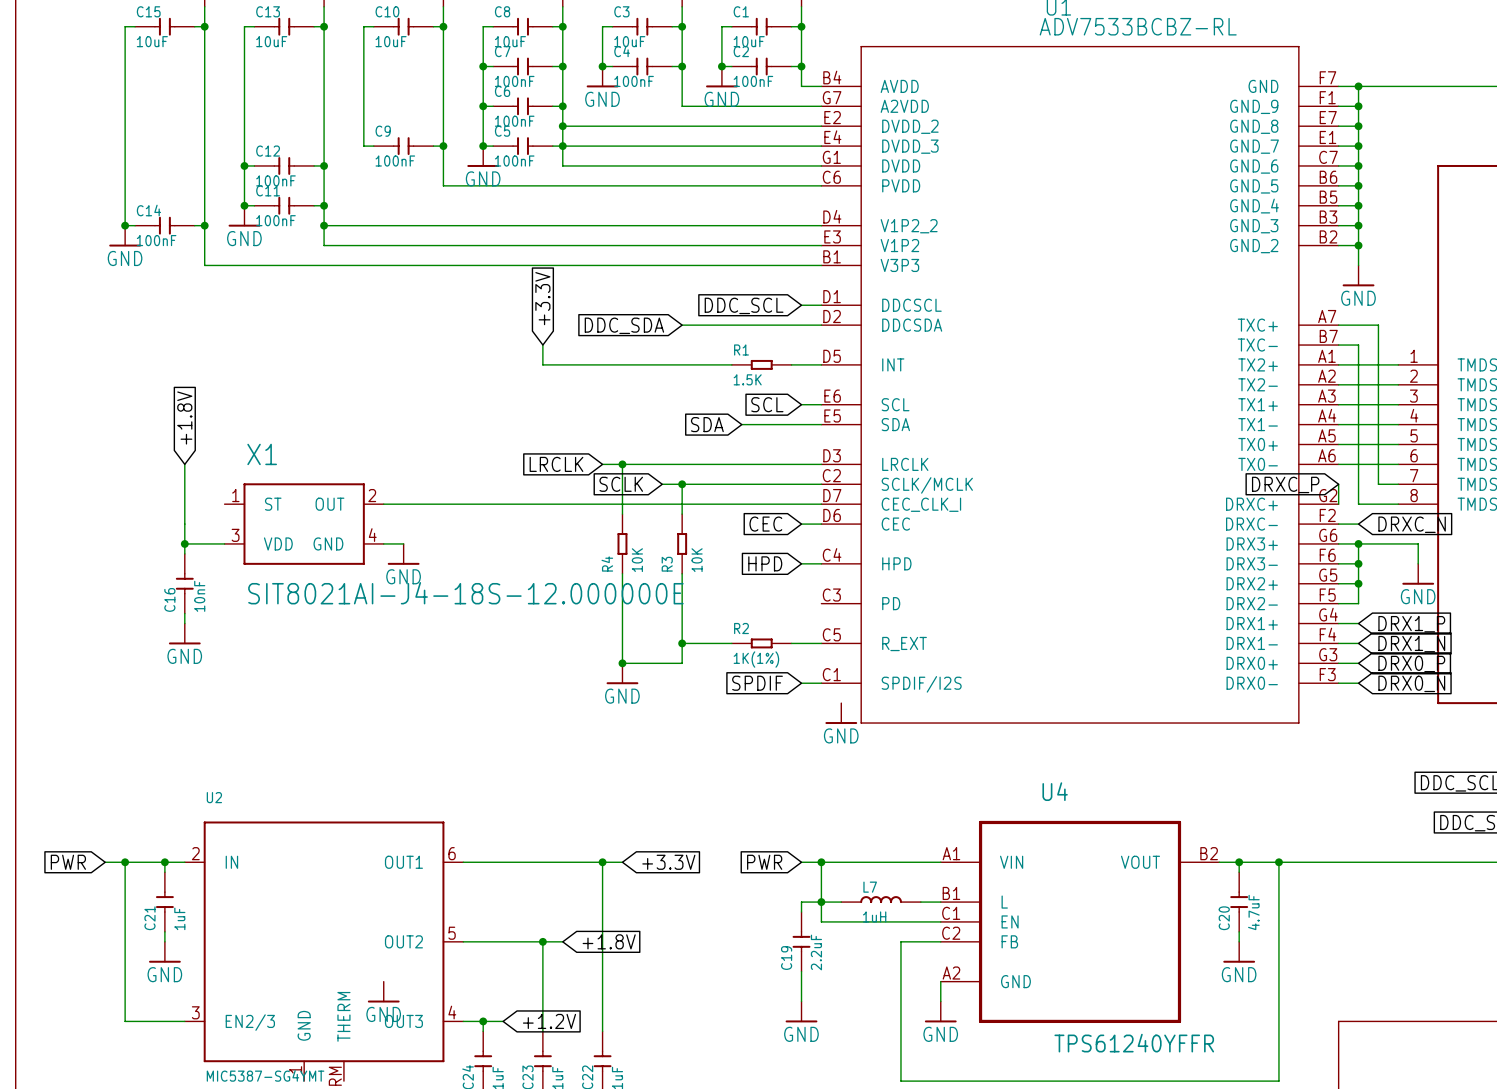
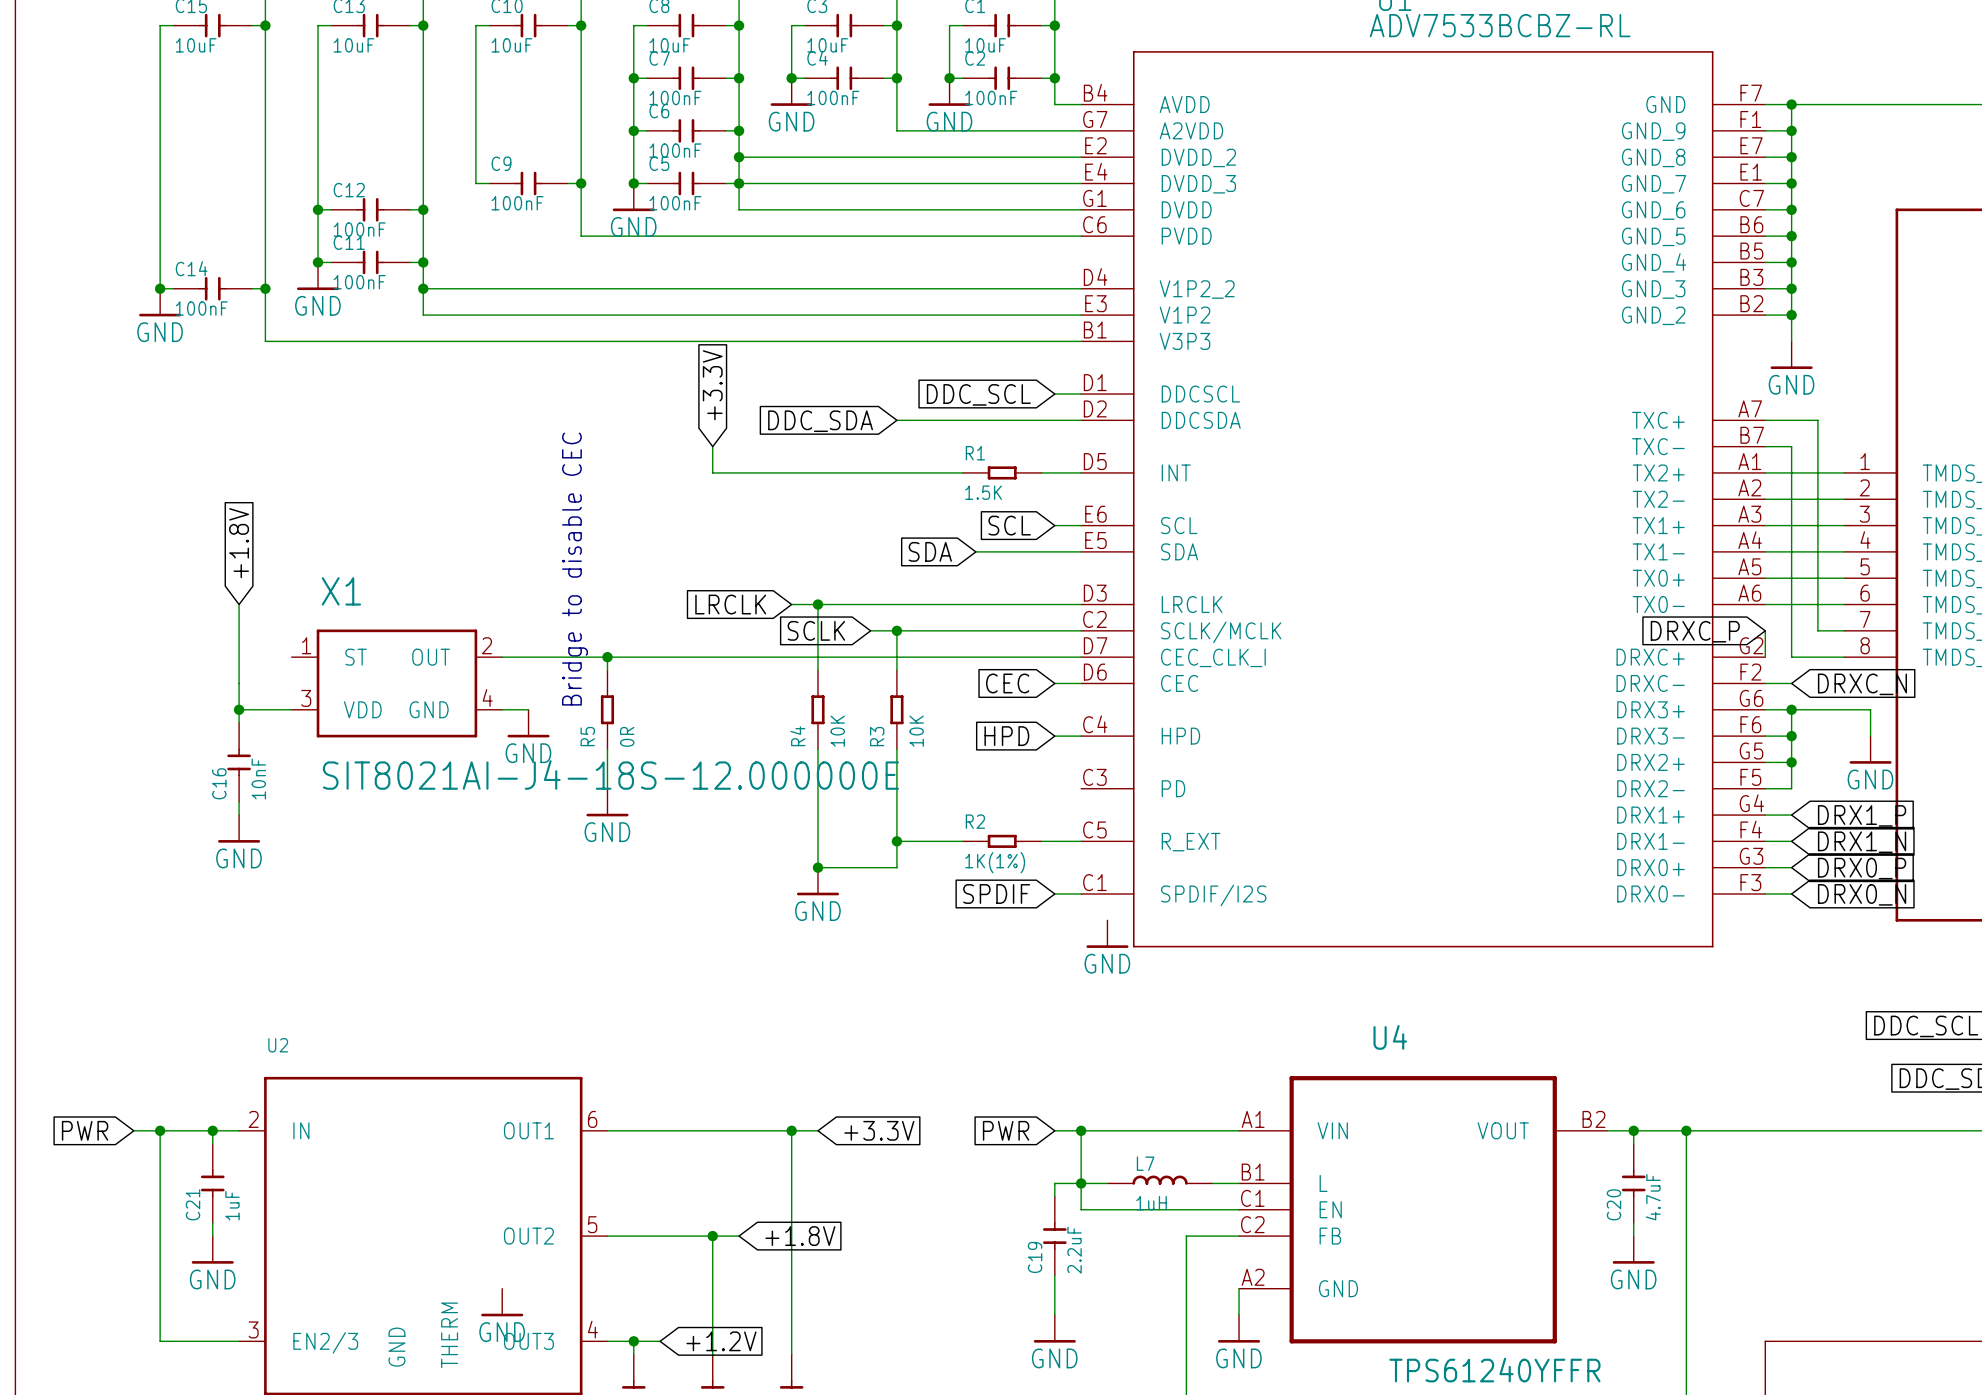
text: none -> Bridge to disable CEC (575, 569)
wire: none -> (607, 657) (607, 670)
junction: none -> (607, 657)
R5: none -> 0R (607, 709)
wire: none -> (607, 749) (607, 788)
power symbol: none -> GND (607, 802)

